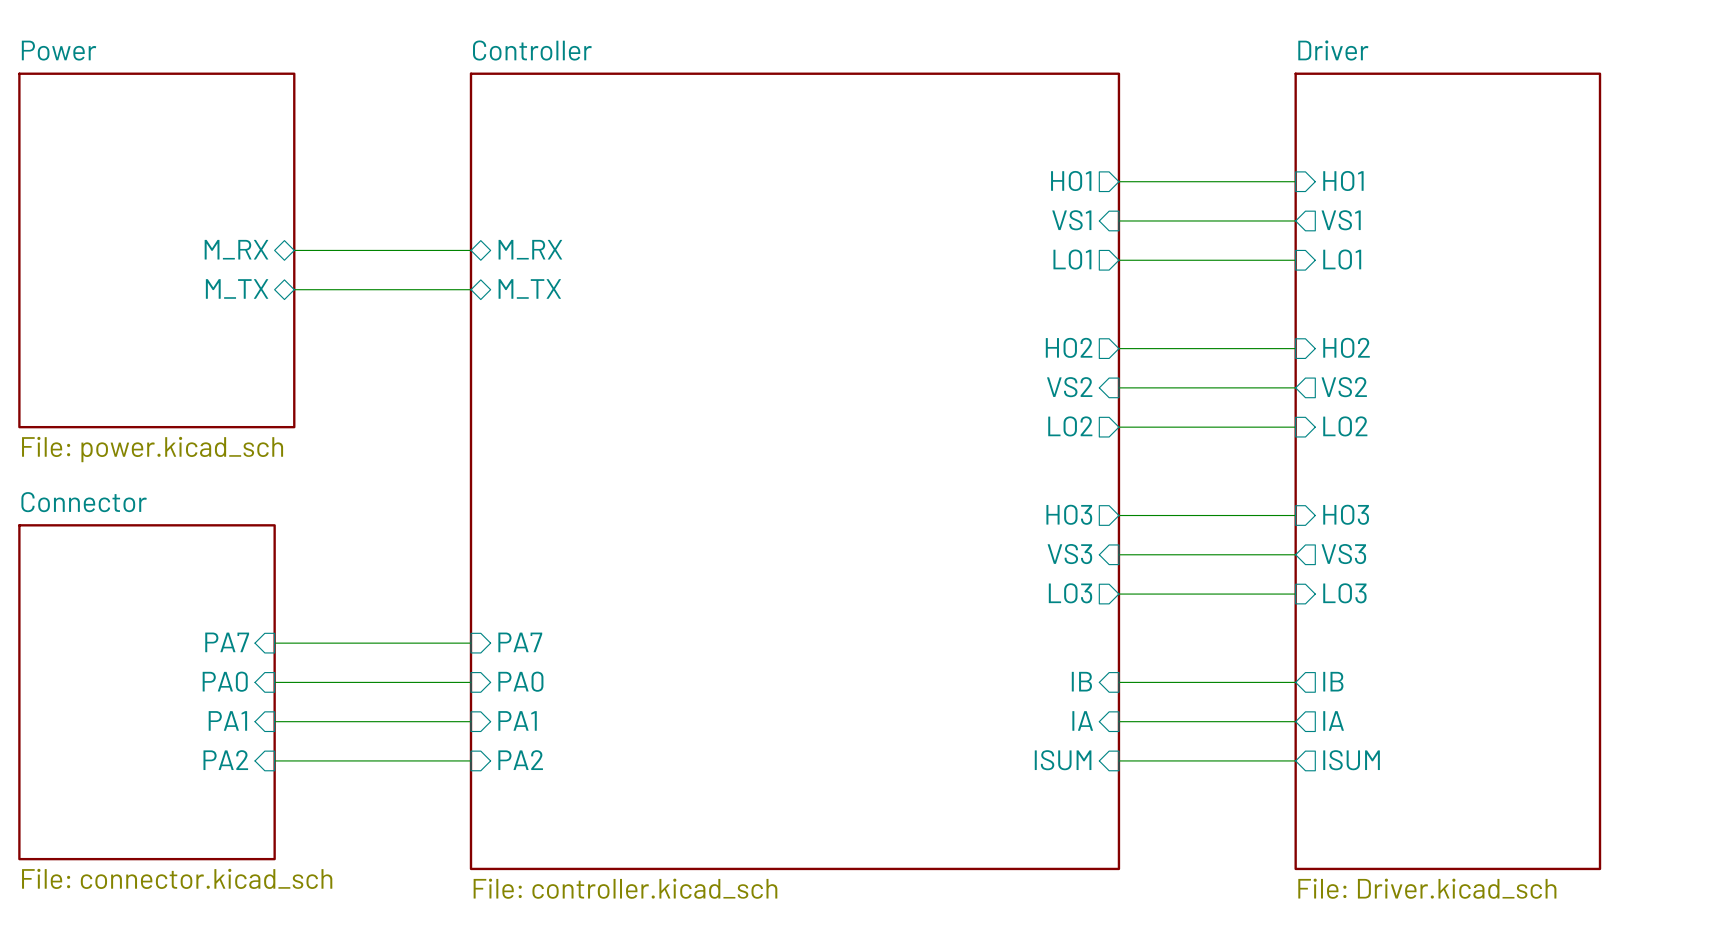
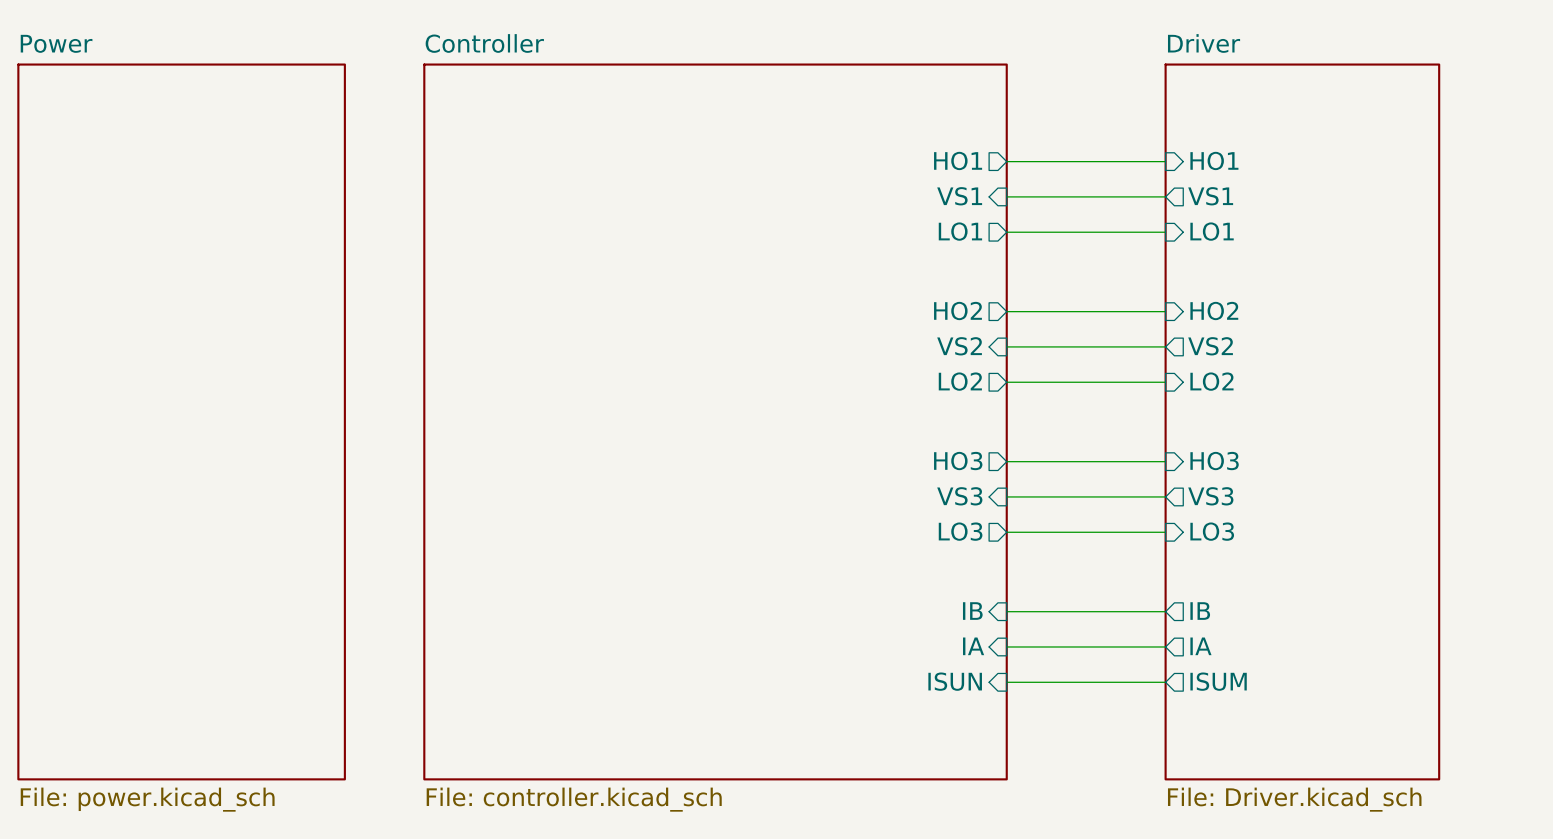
sheet pin: M_RX (236, 249) -> none
sheet pin: M_RX (530, 249) -> none
sheet Power: File: power.kicad_sch (156, 250) -> none
wire: (294, 250) (470, 250) -> none
sheet pin: M_TX (237, 288) -> none
sheet pin: M_TX (529, 288) -> none
wire: (294, 289) (470, 289) -> none
sheet Power: none -> File: power.kicad_sch (181, 421)
sheet pin: PA7 (227, 642) -> none
sheet pin: PA7 (520, 642) -> none
wire: (274, 643) (470, 643) -> none
sheet pin: PA0 (225, 681) -> none
sheet pin: PA0 (520, 681) -> none
wire: (274, 682) (470, 682) -> none
sheet Connector: File: connector.kicad_sch (147, 692) -> none
sheet pin: PA1 (227, 720) -> none
sheet pin: PA1 (517, 720) -> none
wire: (274, 721) (470, 721) -> none
sheet pin: PA2 (225, 760) -> none
wire: (274, 760) (470, 760) -> none
sheet pin: PA2 (520, 760) -> none
sheet pin: ISUM (1063, 760) -> ISUN (955, 681)

